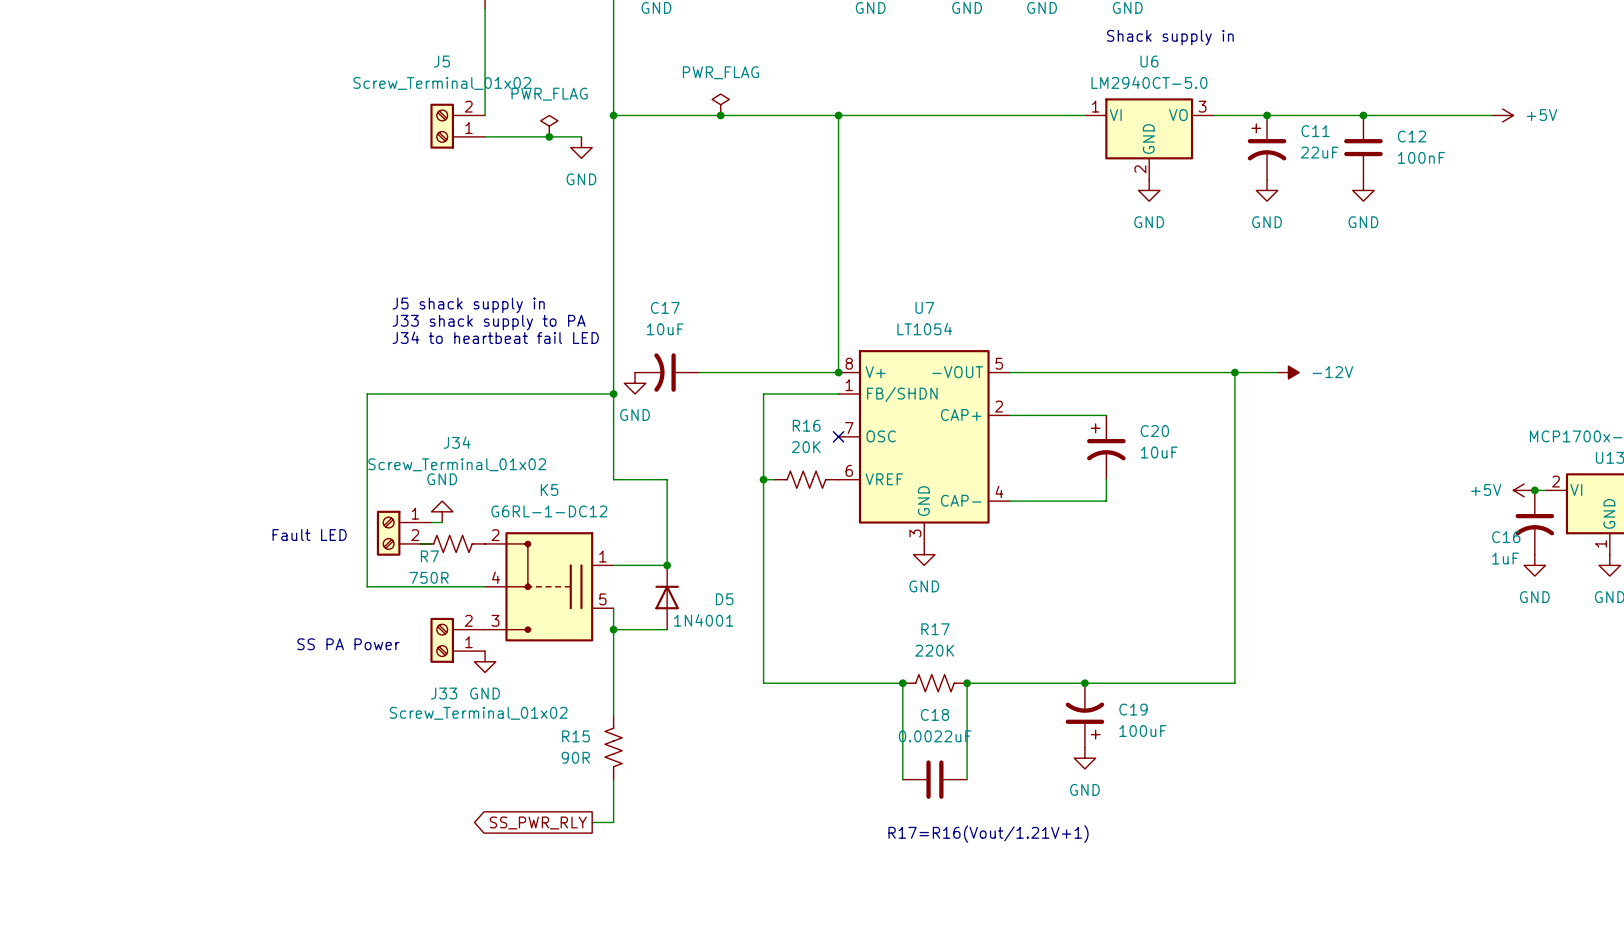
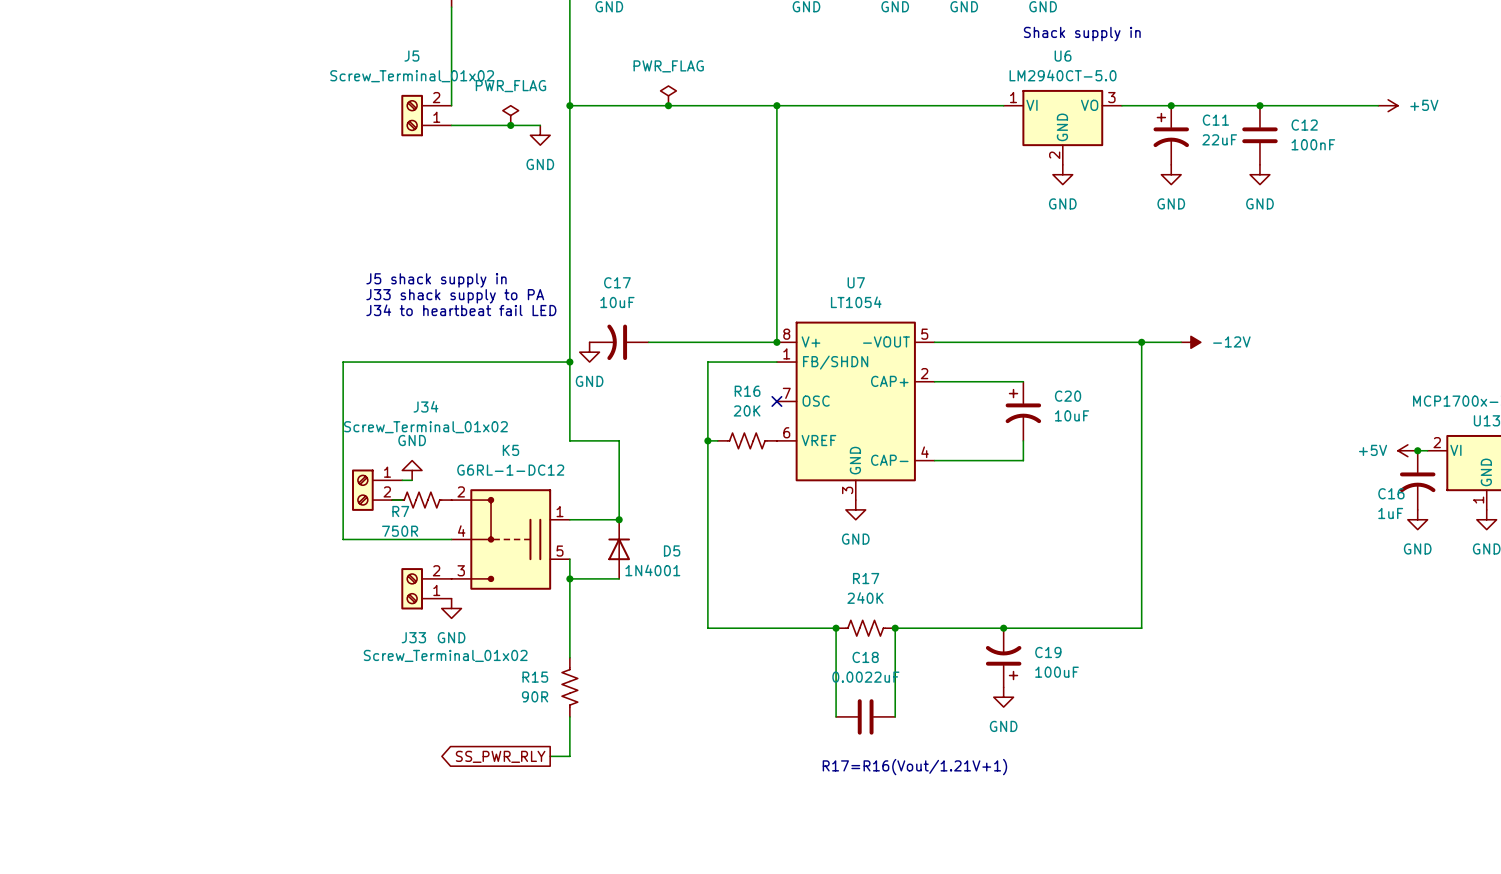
text: Fault LED (309, 535) -> none
text: SS PA Power (348, 644) -> none
R17 value: 220K (934, 650) -> 240K (865, 598)

